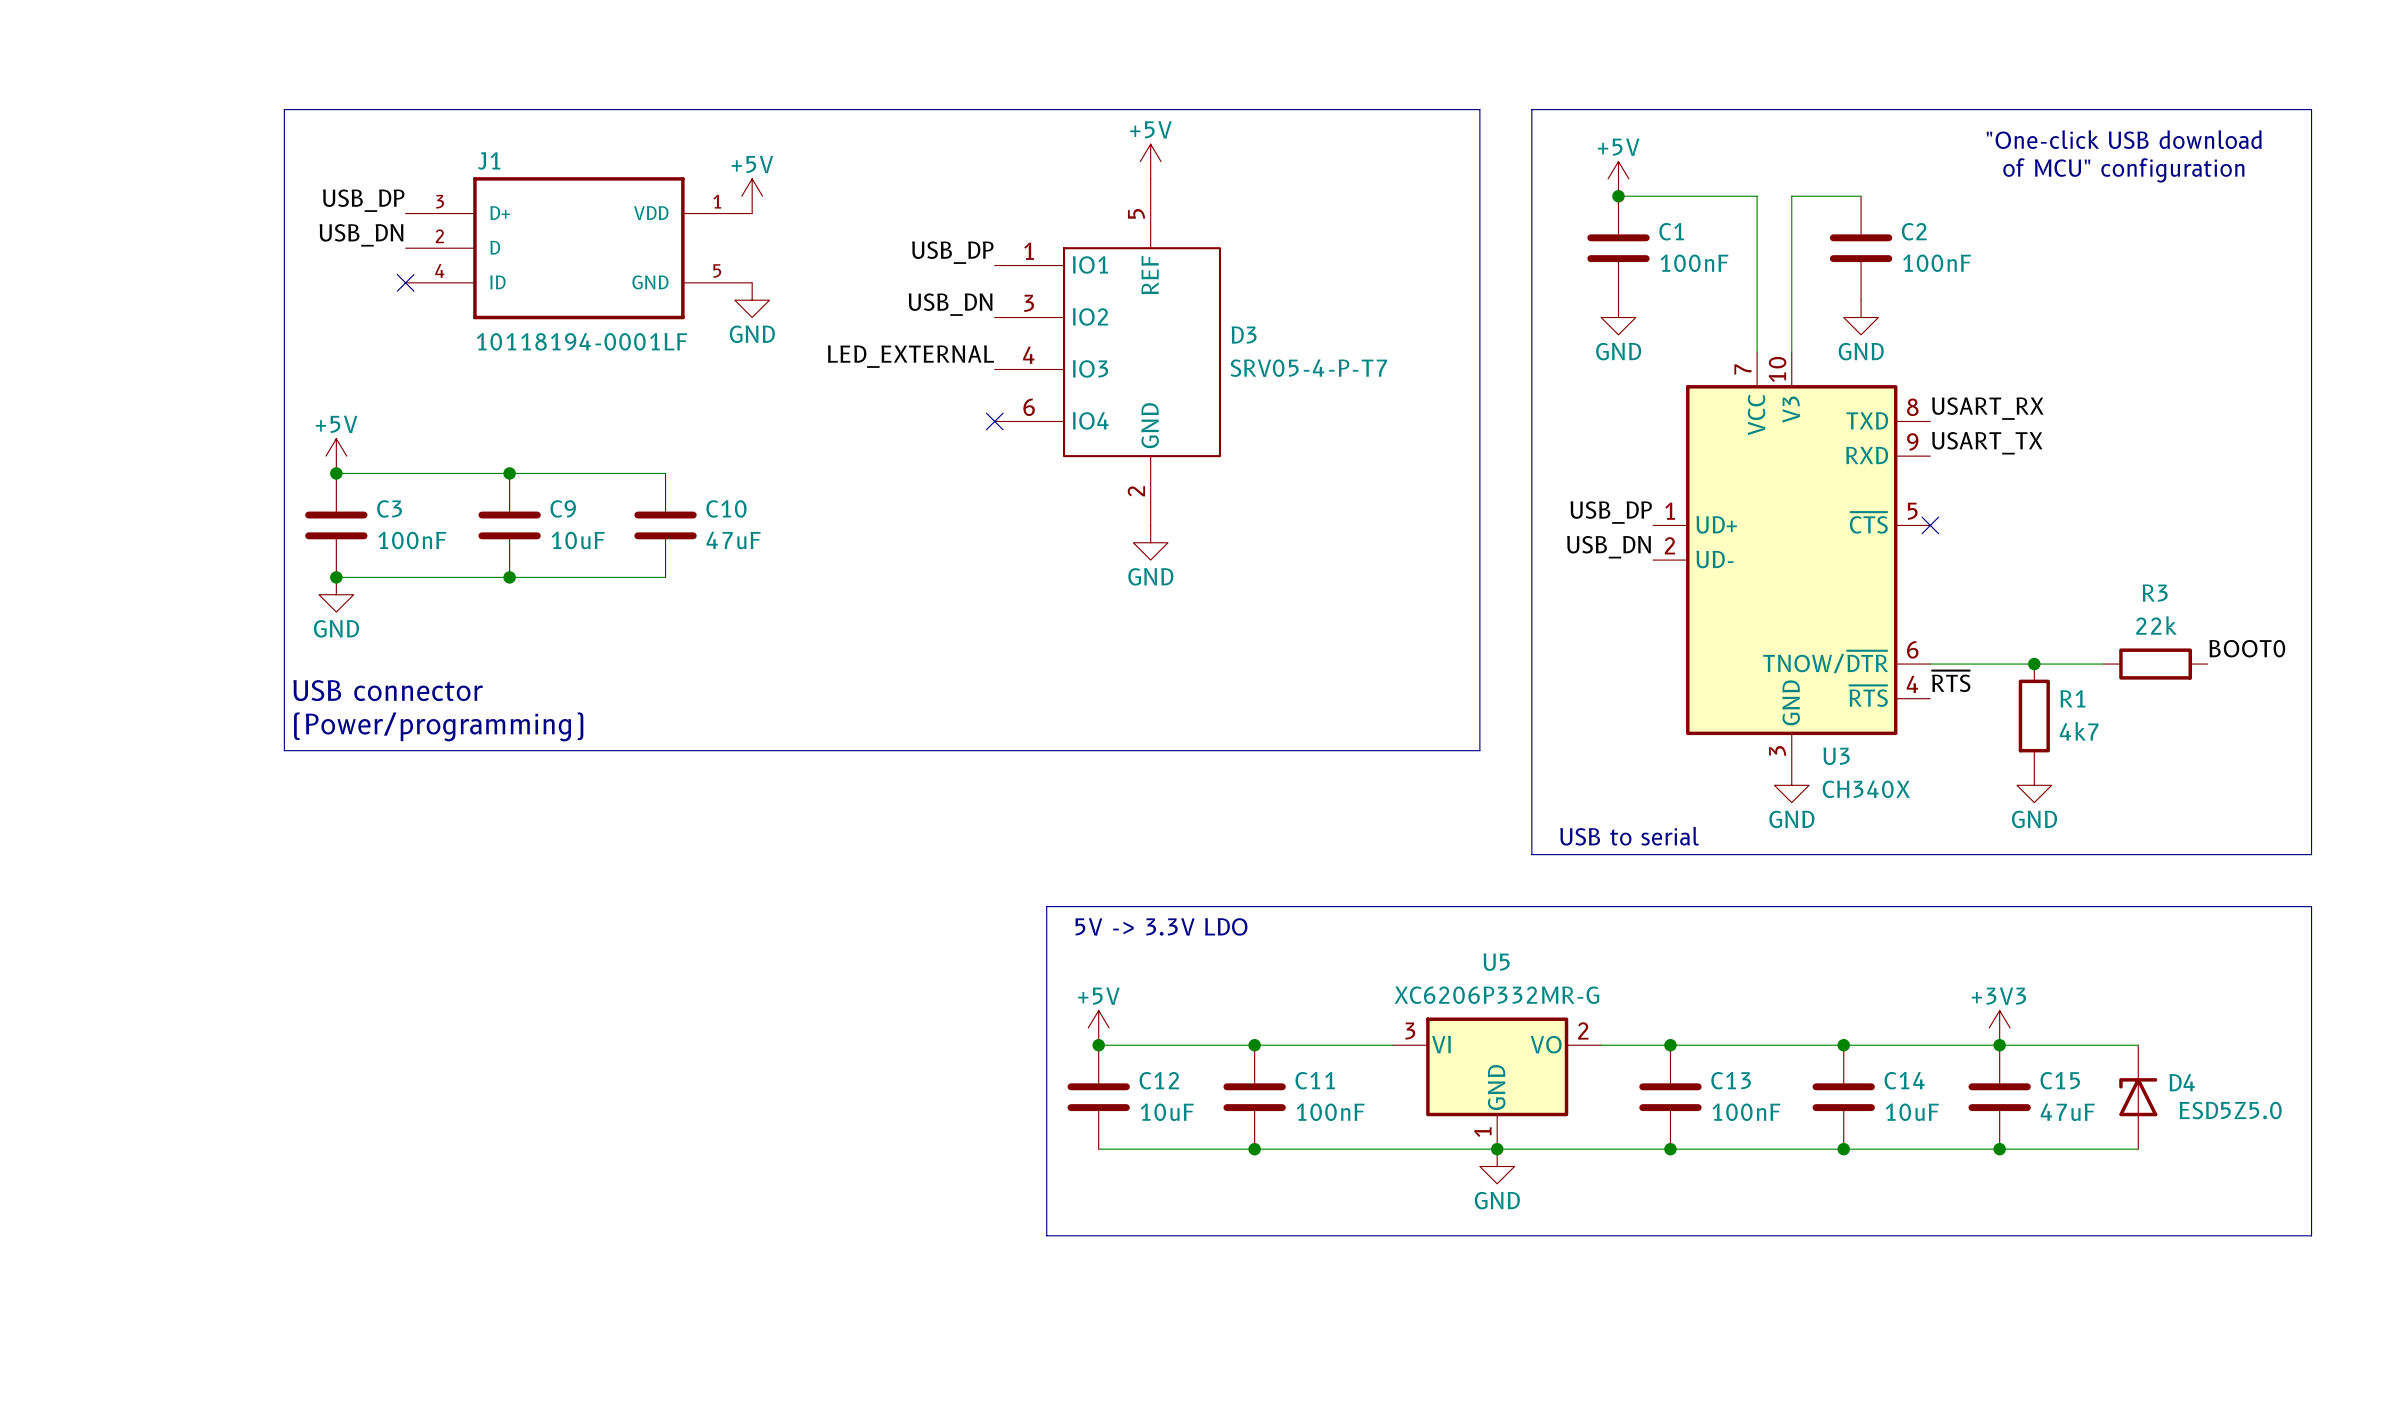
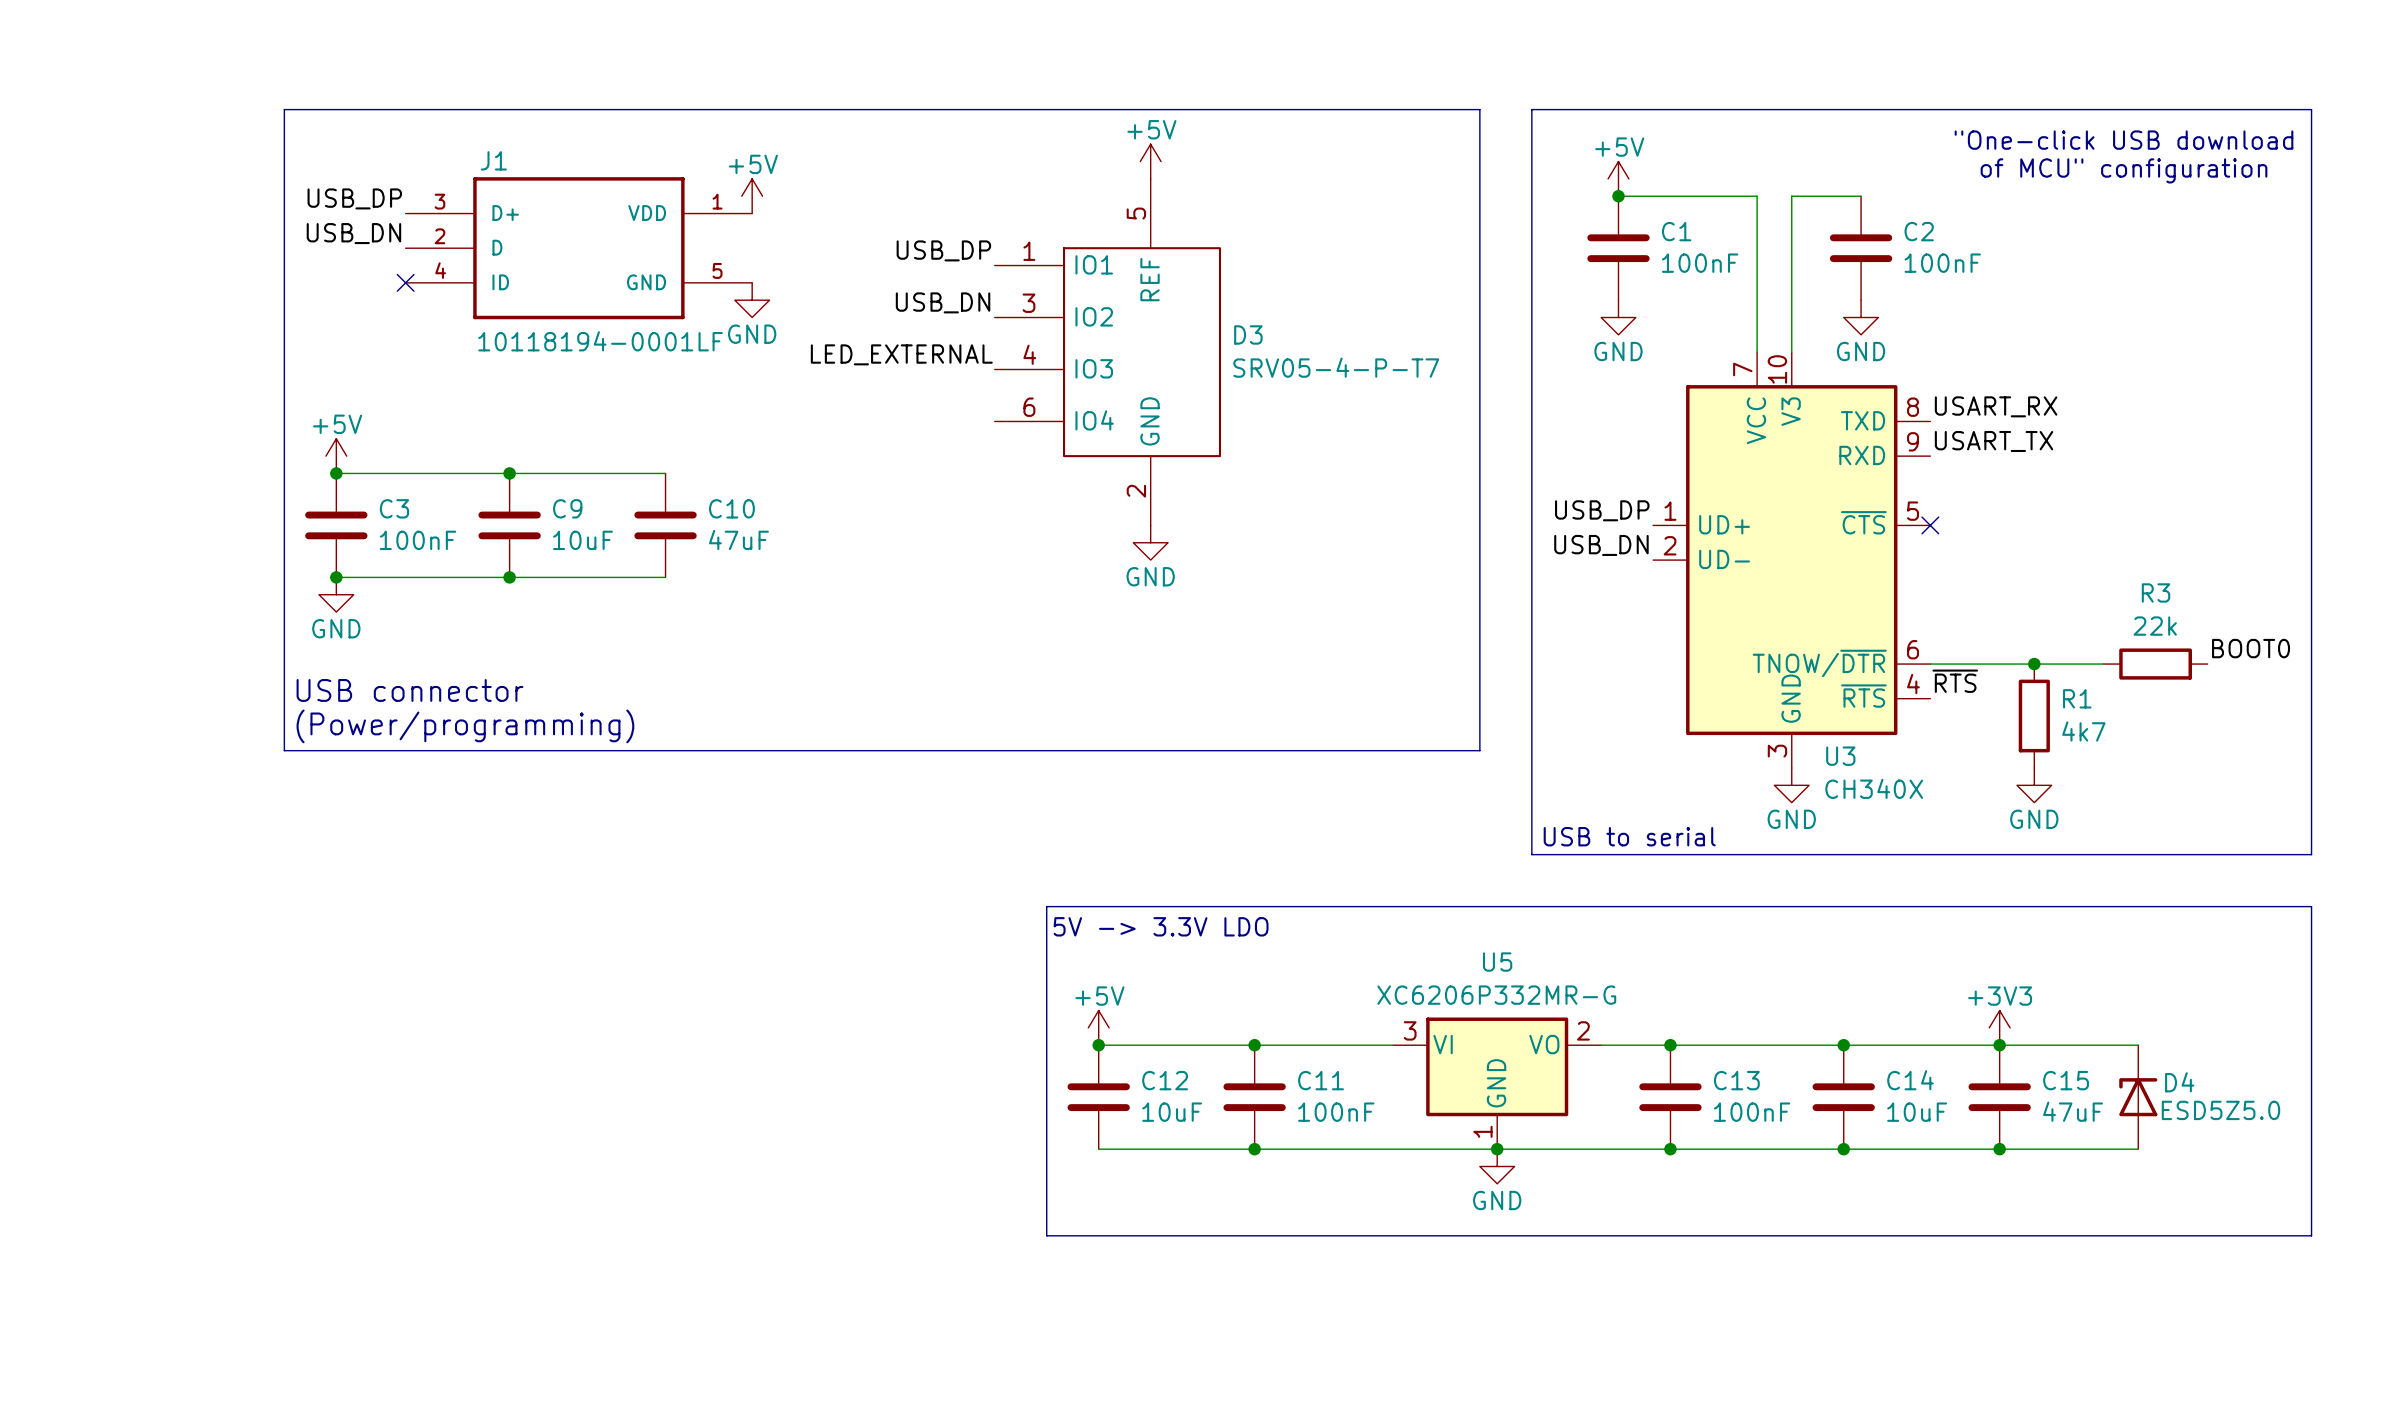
no-connect mark: (994, 421) -> none

